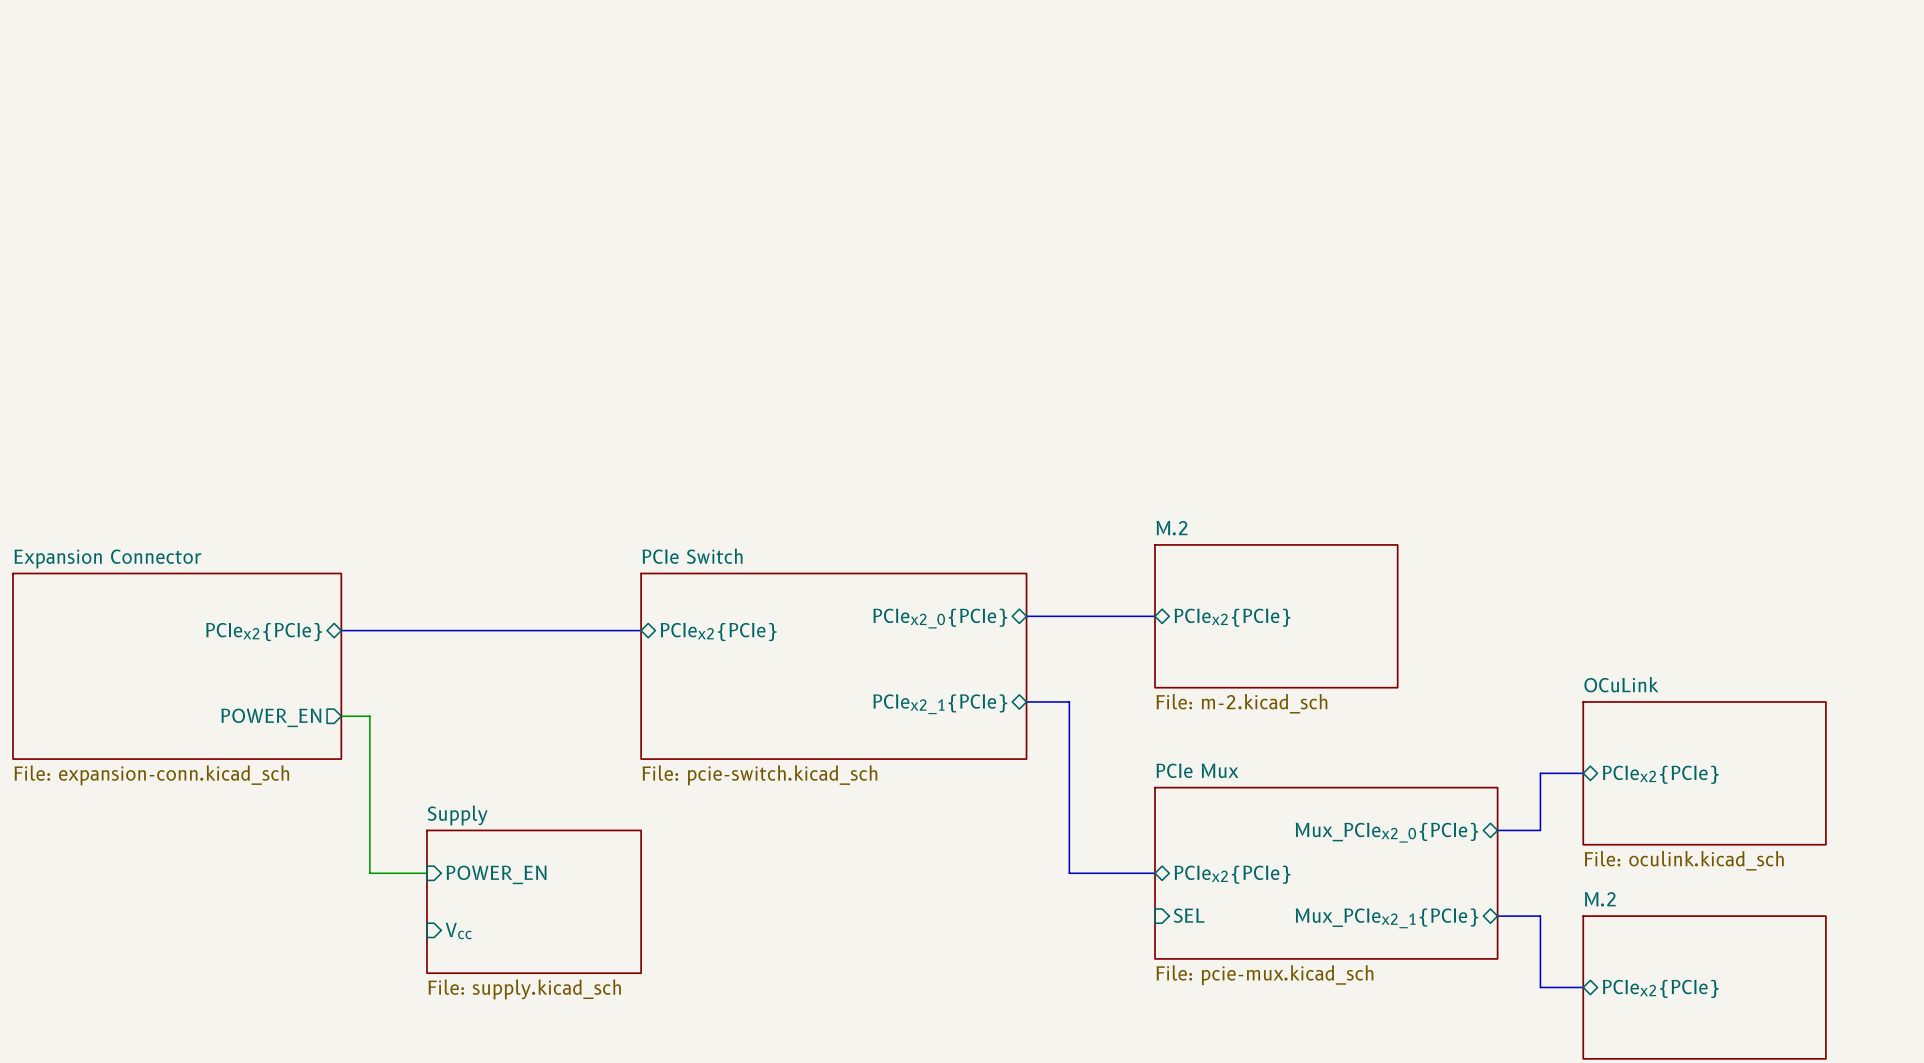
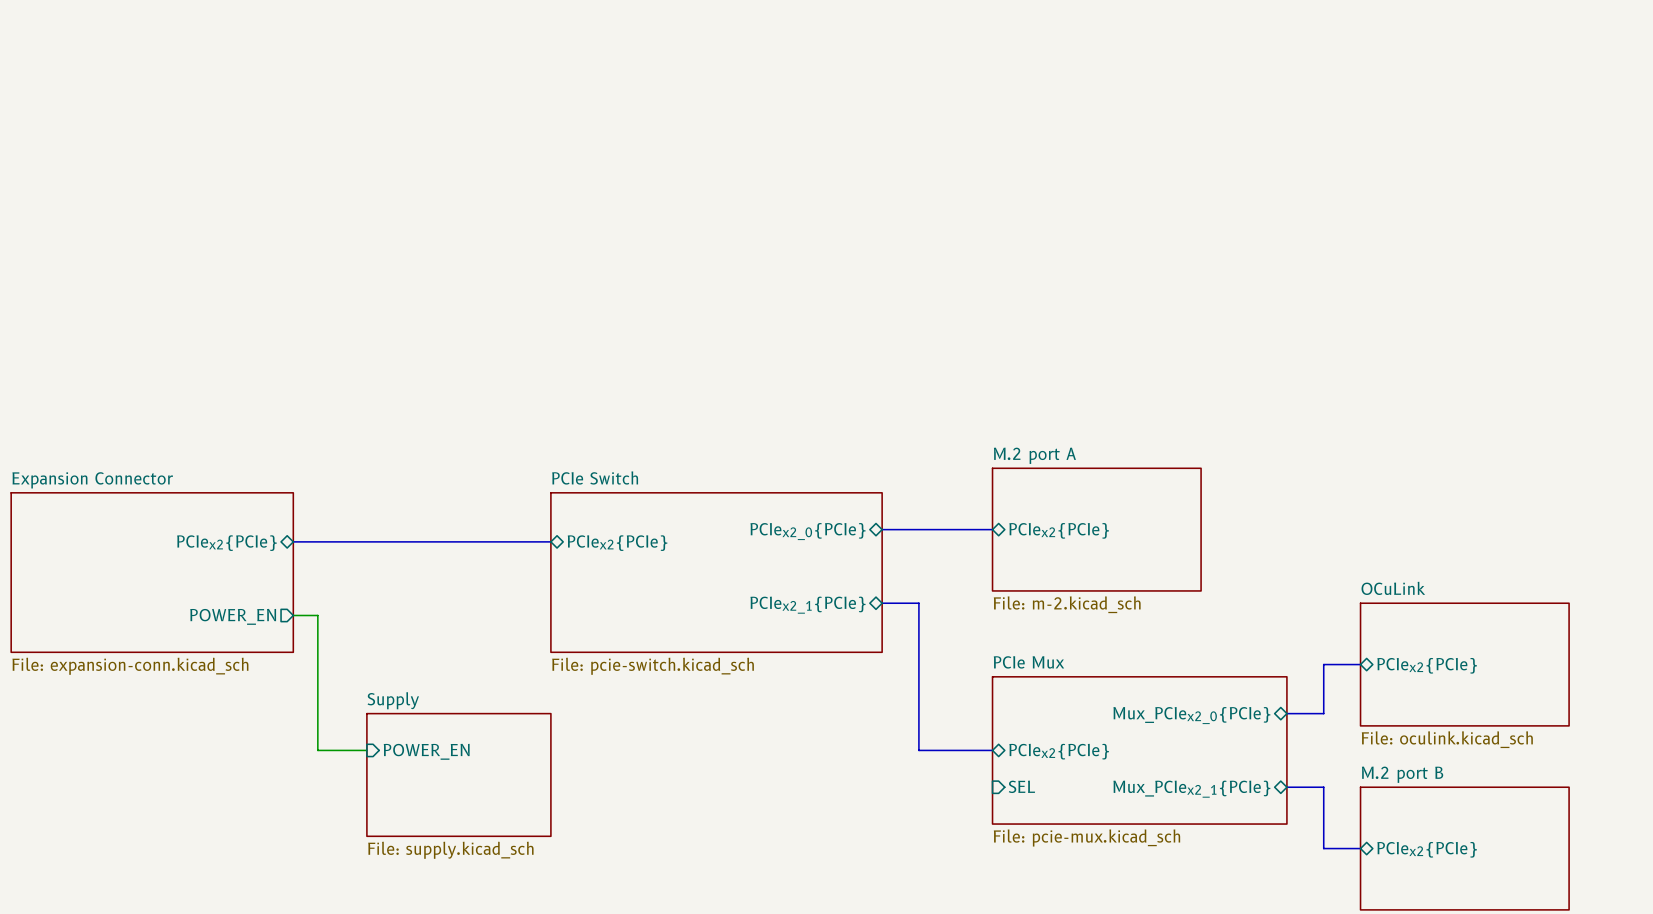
sheet M.2 name: M.2 (1172, 528) -> M.2 port A (1034, 455)
sheet M.2 name: M.2 (1600, 899) -> M.2 port B (1402, 774)
sheet pin: Vcc (458, 930) -> none

